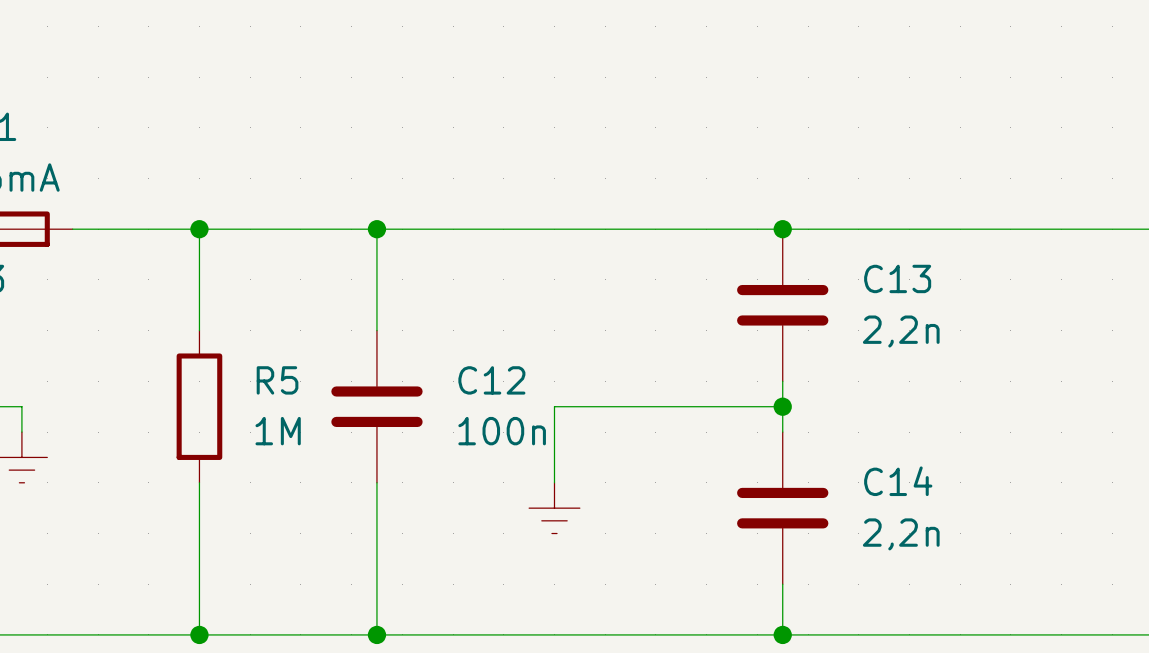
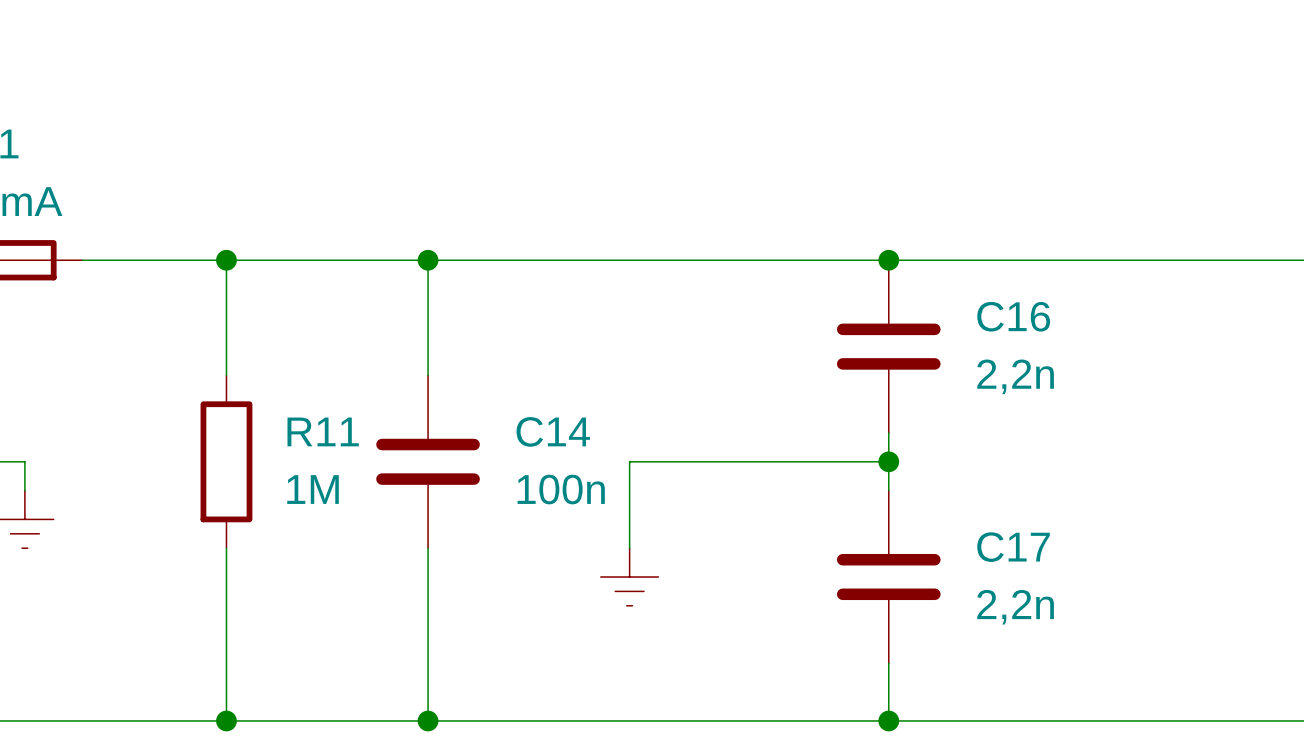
C13 name: C13 (897, 278) -> C16 (1013, 316)
R5 name: R5 (277, 380) -> R11 (323, 431)
C12 name: C12 (491, 380) -> C14 (553, 431)
C14 name: C14 (898, 481) -> C17 (1013, 547)

